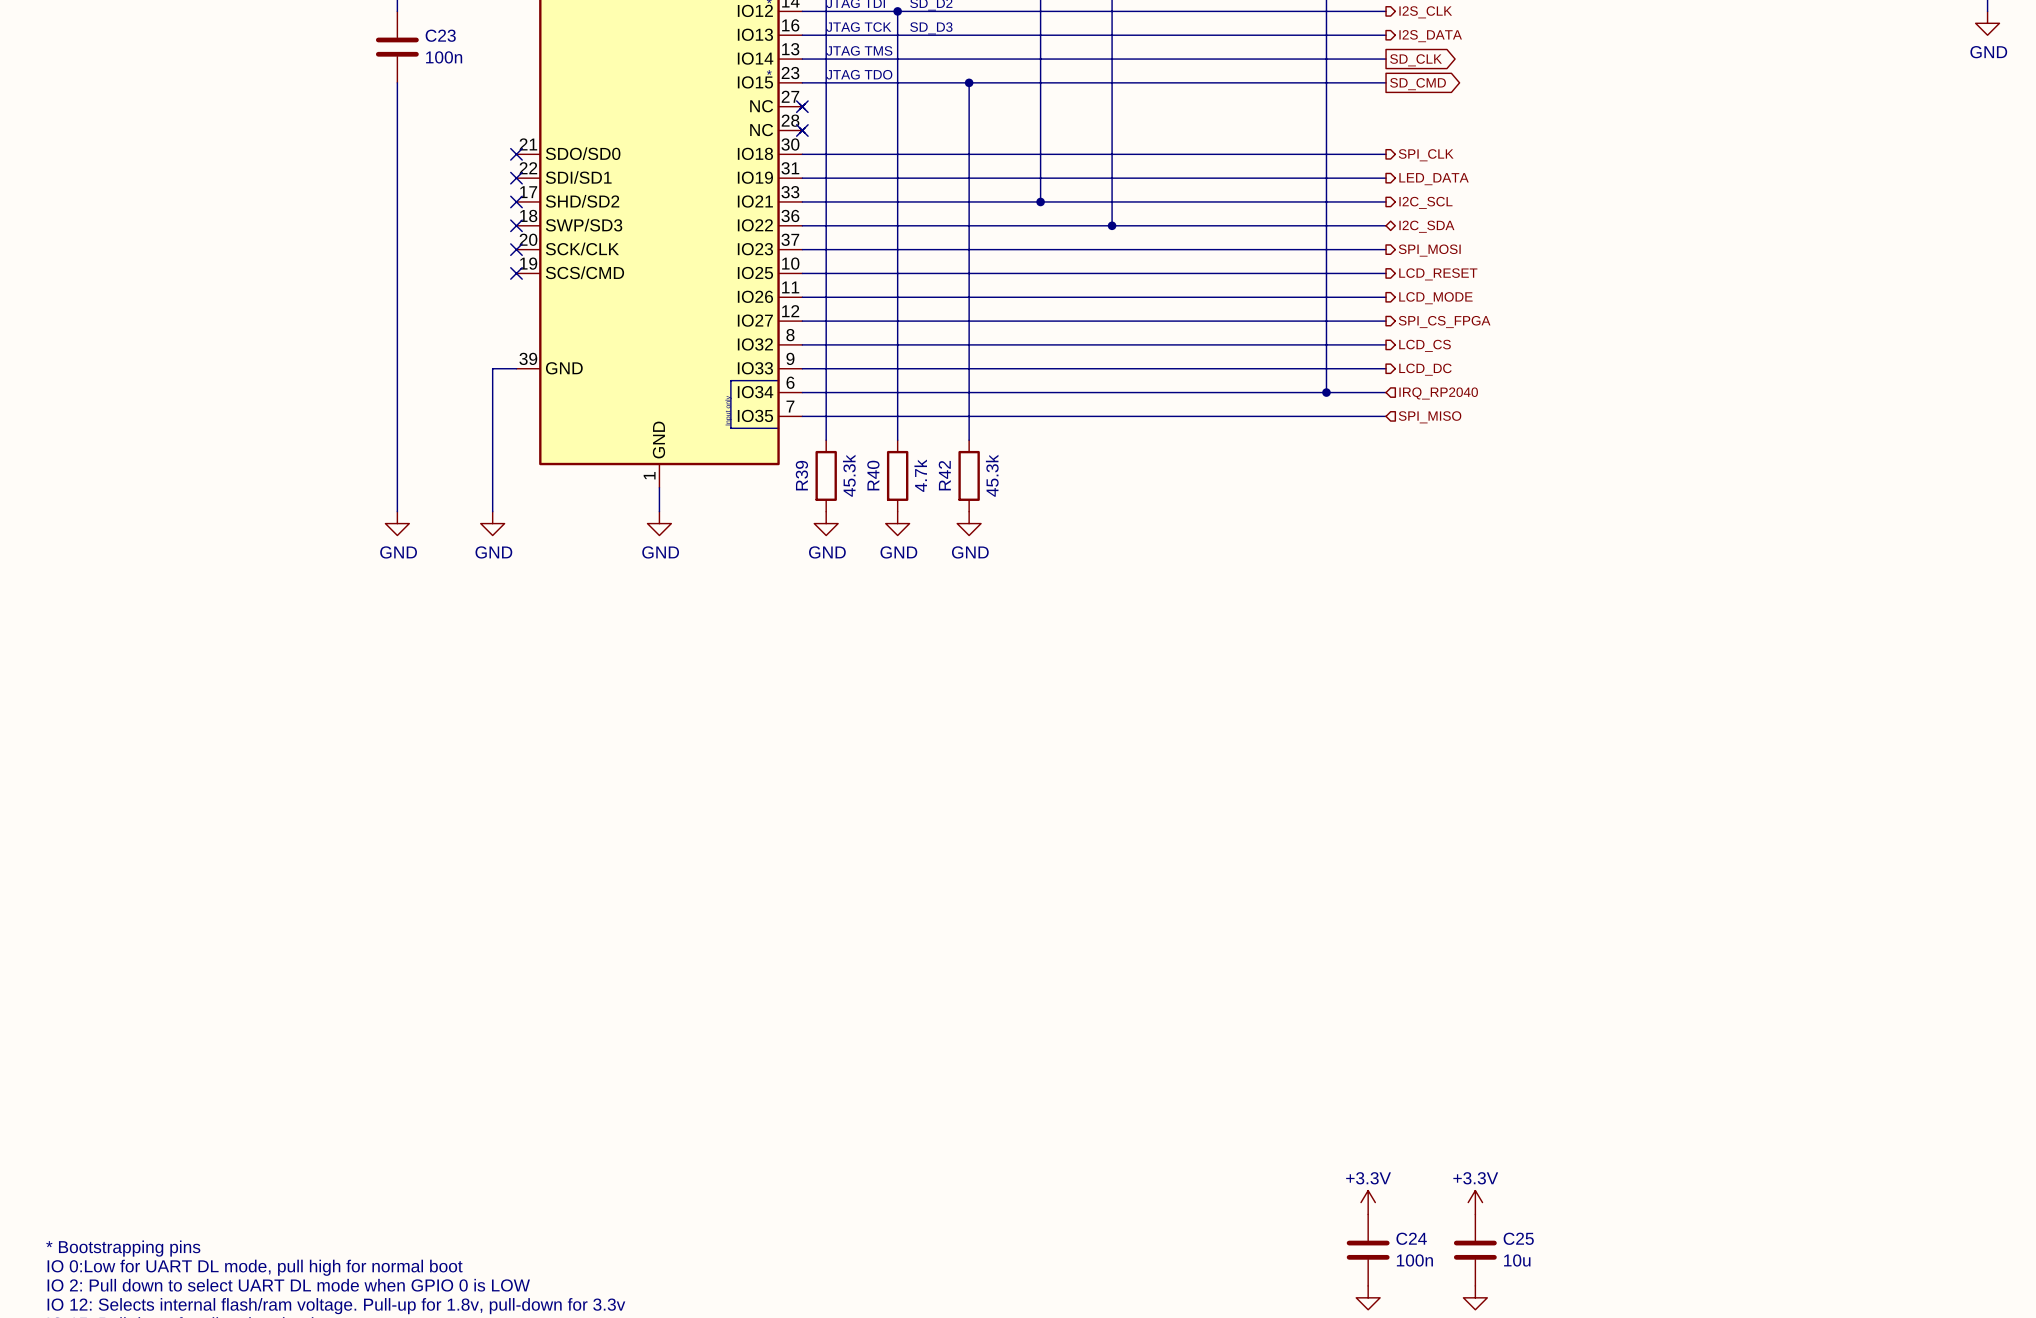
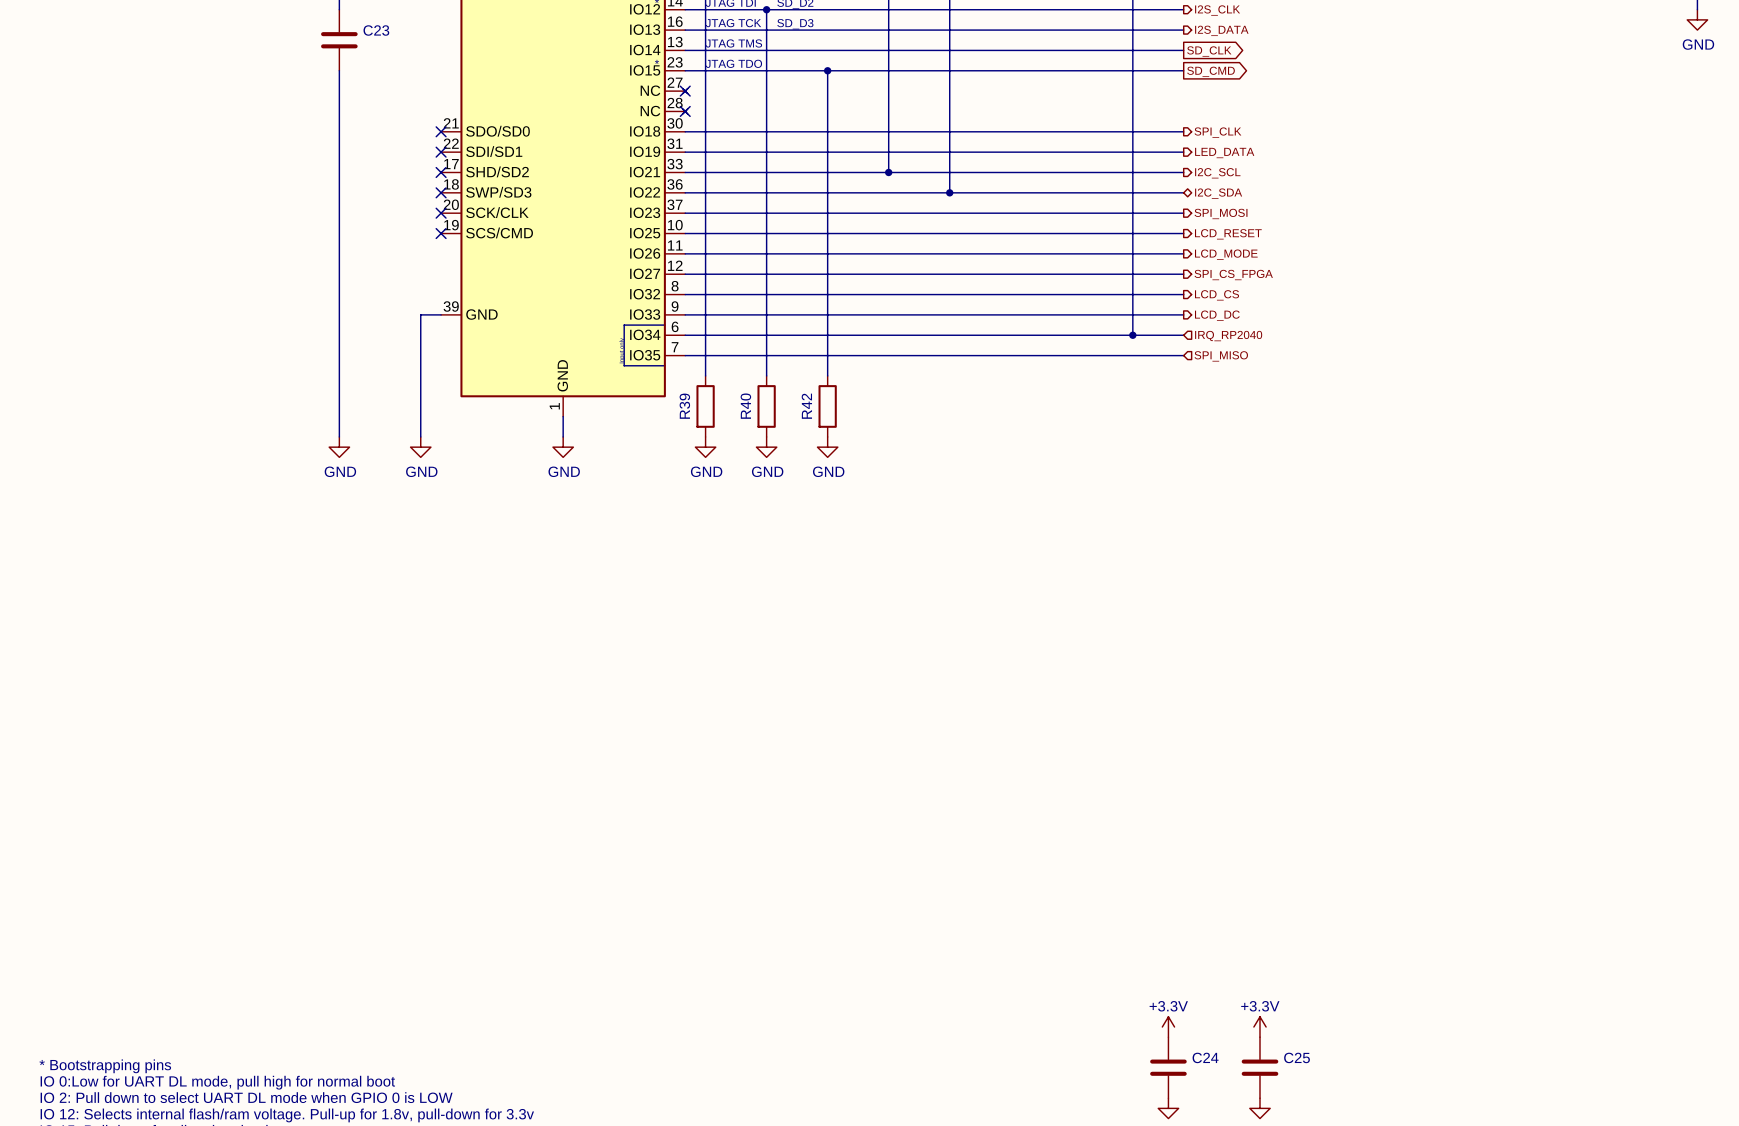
C23 value: 100n (444, 57) -> none
R39 value: 45.3k (849, 475) -> none
R40 value: 4.7k (920, 475) -> none
R42 value: 45.3k (992, 475) -> none
C24 value: 100n (1414, 1260) -> none
C25 value: 10u (1517, 1260) -> none

